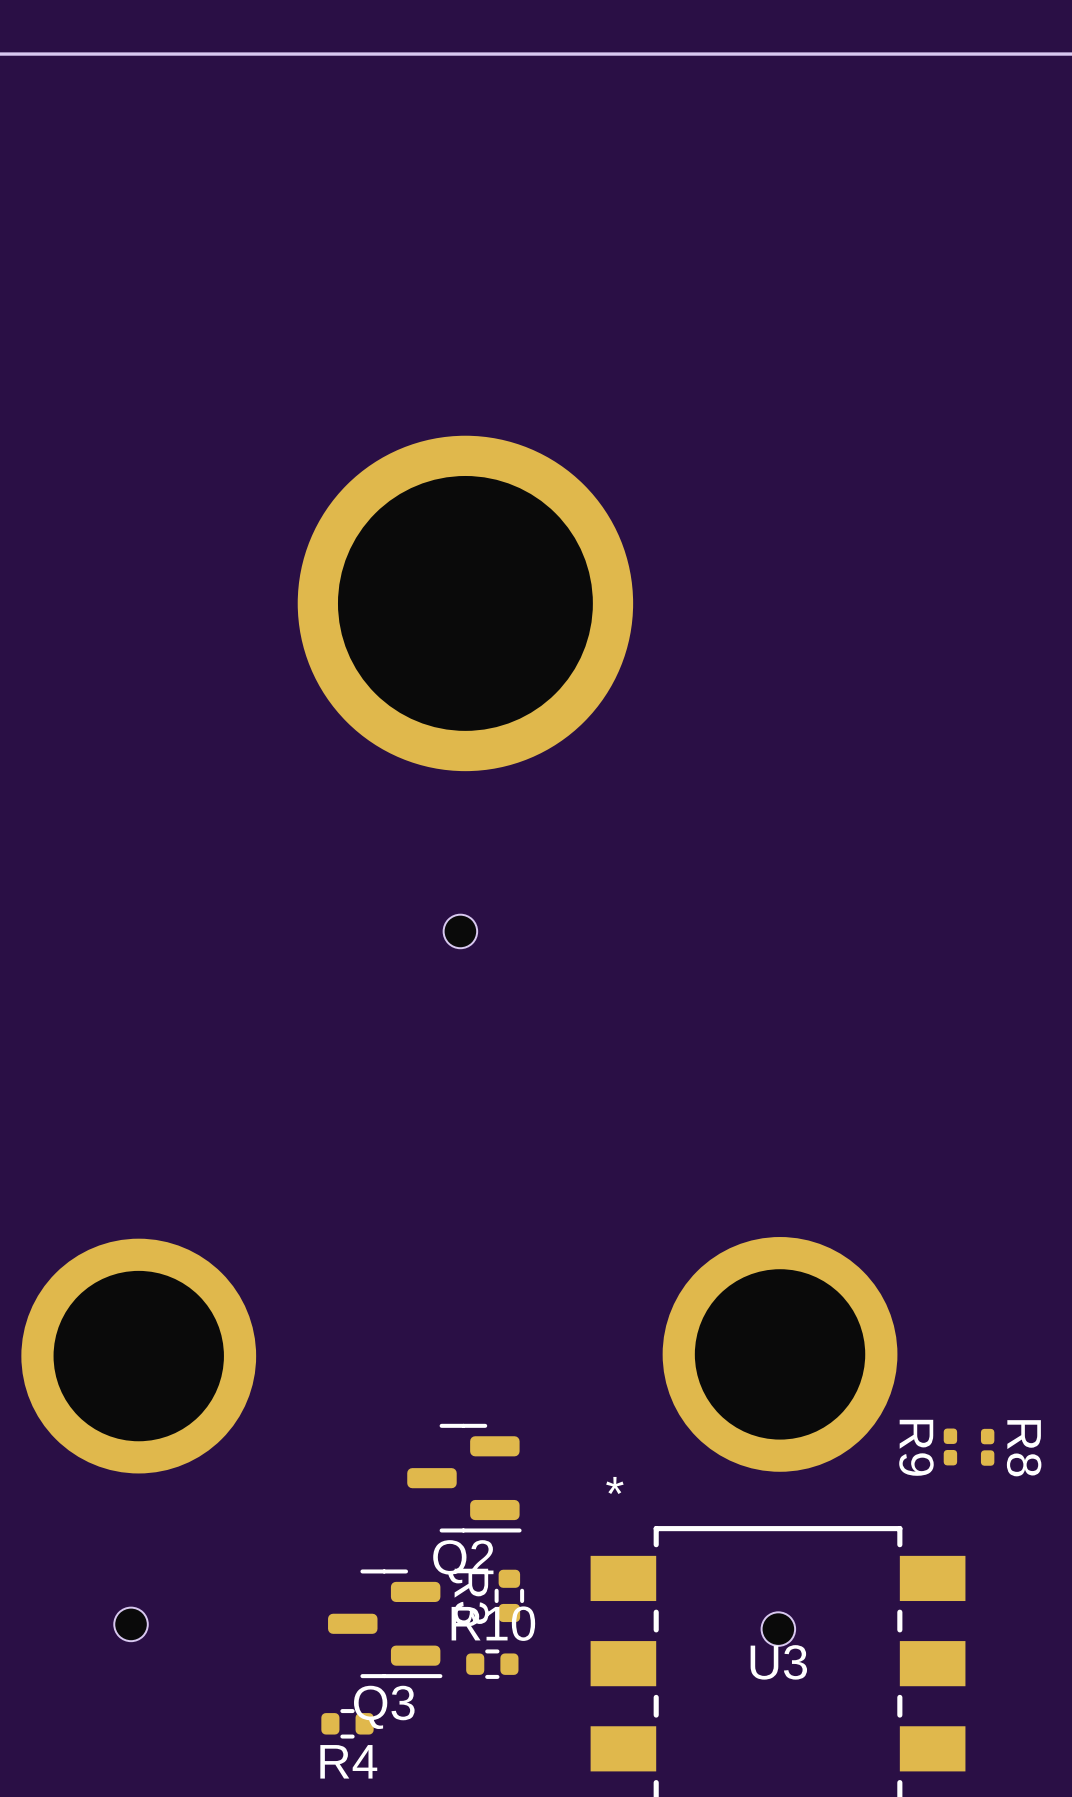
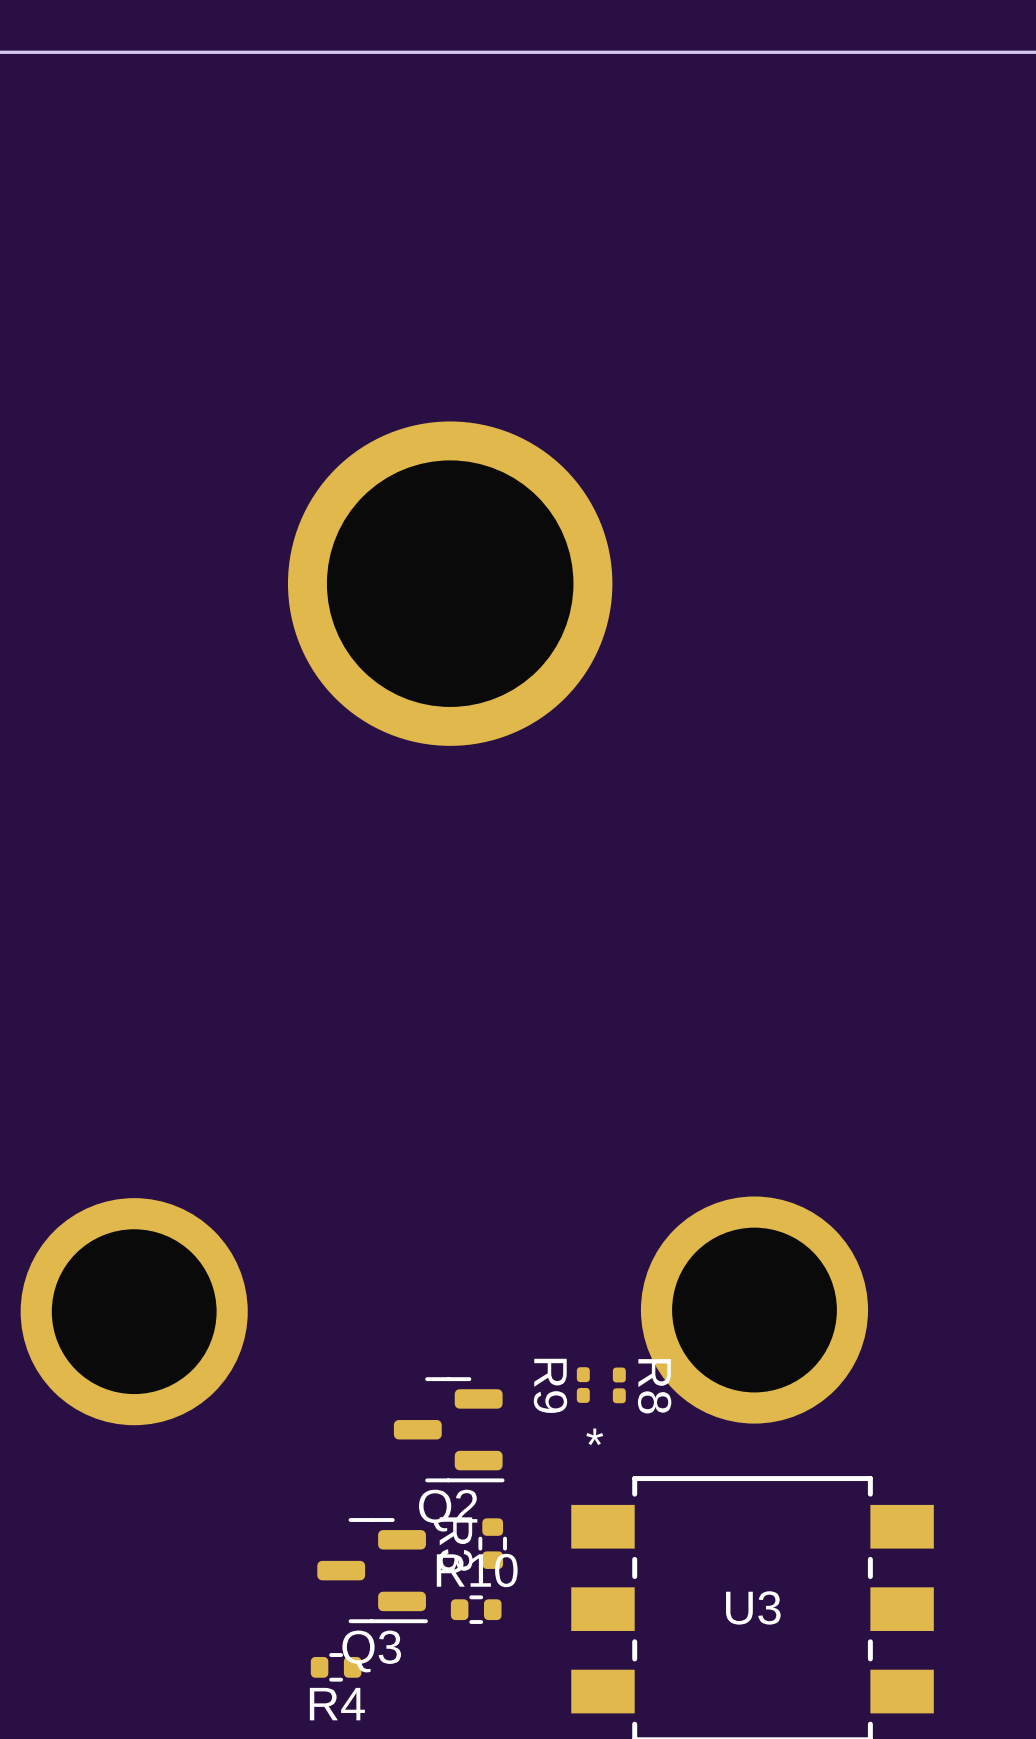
part: (460, 931) -> none
R9 position: (950, 1446) -> (583, 1385)
R8 position: (987, 1447) -> (619, 1385)
part: (131, 1624) -> none
part: (778, 1629) -> none

